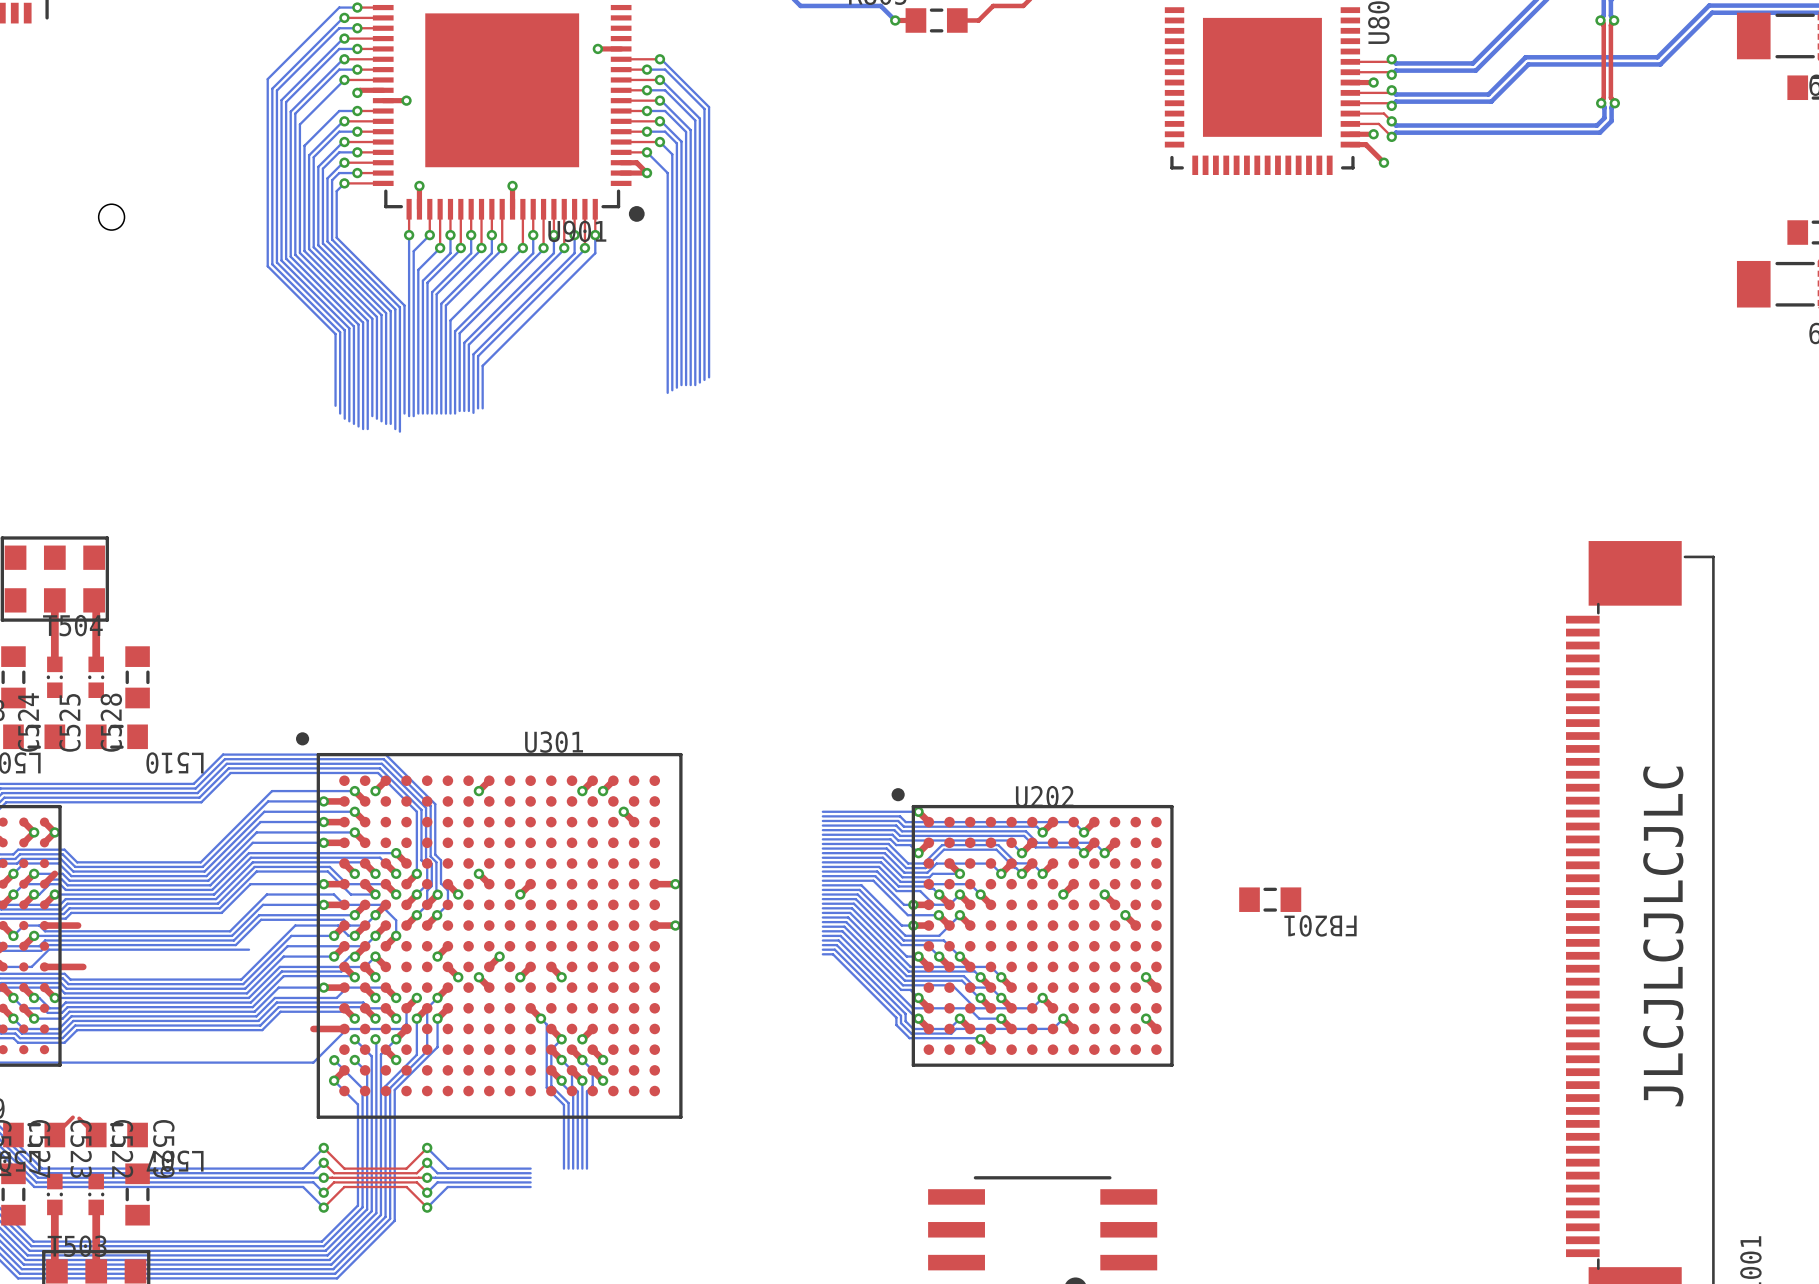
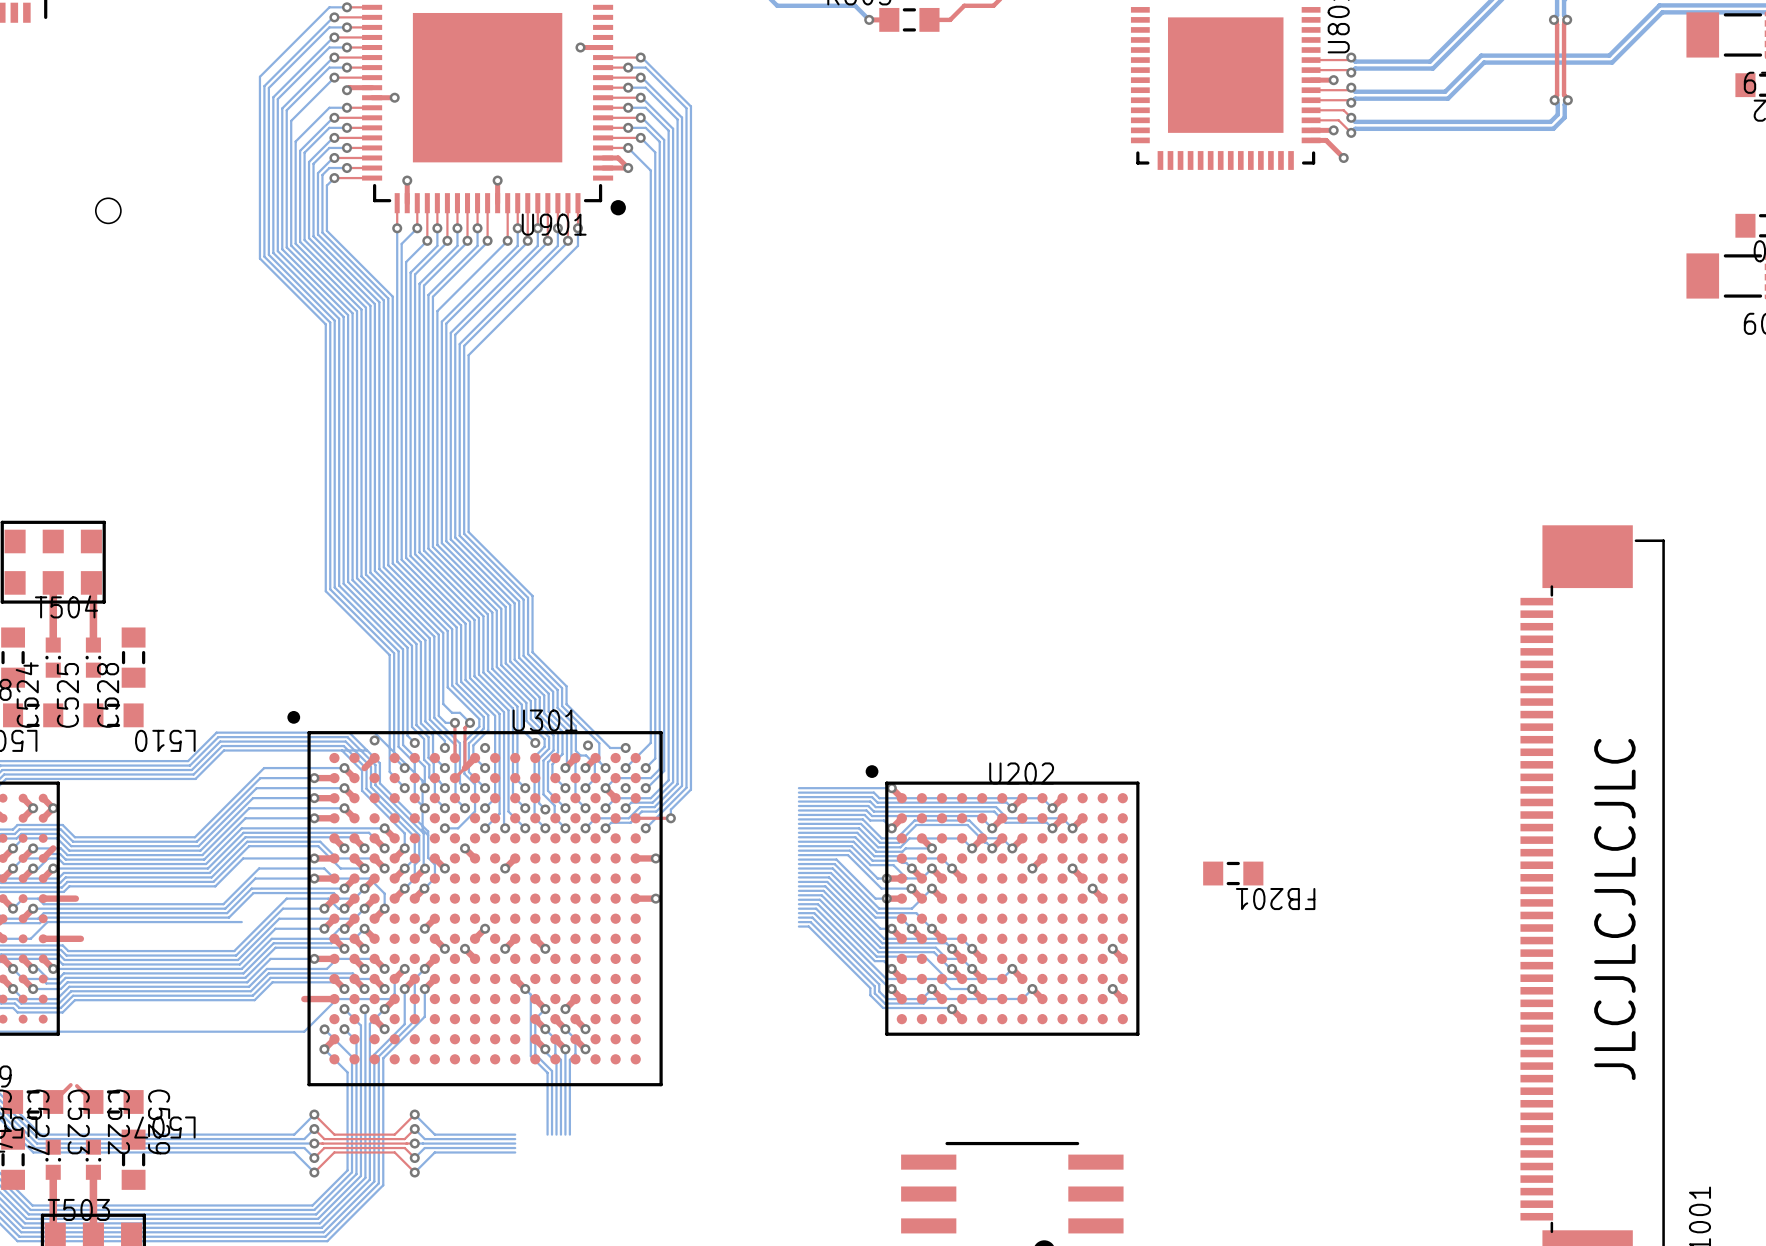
bottom track: (709, 107) (709, 377) -> (688, 103) (690, 106) (690, 789) (670, 809) (670, 818)
bottom track: (704, 108) (704, 379) -> (683, 105) (686, 108) (686, 787) (645, 828)
bottom track: (699, 118) (699, 382) -> (679, 115) (682, 117) (682, 785) (656, 811) (641, 811) (630, 822) (611, 822) (605, 828)
bottom track: (695, 120) (695, 385) -> (675, 116) (677, 119) (677, 784) (654, 807) (639, 807) (628, 818) (595, 818) (585, 828)
bottom track: (690, 130) (690, 385) -> (670, 126) (673, 128) (673, 782) (652, 802) (631, 802) (625, 808)
bottom track: (686, 131) (686, 385) -> (666, 128) (668, 130) (668, 780) (650, 798) (615, 798) (605, 808)
bottom track: (681, 141) (681, 385) -> (661, 137) (664, 139) (664, 771) (645, 788)
bottom track: (676, 143) (676, 387) -> (657, 139) (659, 141) (659, 769) (650, 778) (615, 778) (605, 788)
bottom track: (672, 154) (672, 390) -> (652, 149) (655, 152) (655, 758) (645, 768)
bottom track: (667, 173) (667, 392) -> (648, 168) (650, 170) (650, 742) (625, 768)
bottom track: none -> (325, 393) (325, 591) (389, 655) (389, 771) (404, 788)
bottom track: none -> (464, 396) (464, 533) (528, 597) (528, 654) (562, 688) (562, 706) (599, 743) (599, 761) (605, 768)
bottom track: none -> (468, 396) (468, 532) (532, 595) (532, 652) (566, 686) (566, 704) (610, 747) (625, 747)
bottom track: none -> (446, 399) (446, 541) (510, 605) (510, 661) (544, 695) (544, 713) (562, 731) (562, 754) (552, 764) (552, 775) (565, 788)
bottom track: none -> (450, 399) (450, 539) (514, 603) (514, 659) (548, 693) (548, 711) (566, 729) (565, 768)
bottom track: none -> (455, 399) (455, 537) (519, 601) (519, 657) (553, 691) (553, 709) (571, 728) (571, 758) (575, 763) (575, 798) (585, 808)
bottom track: none -> (459, 400) (459, 535) (523, 599) (523, 655) (557, 689) (557, 707) (575, 726) (575, 750) (580, 755) (586, 755) (594, 764) (594, 778) (585, 788)
bottom track: none -> (330, 401) (330, 589) (394, 653) (394, 757) (404, 768)
bottom track: none -> (392, 401) (392, 563) (456, 627) (456, 683) (488, 715) (488, 730) (473, 745) (473, 756) (485, 768)
bottom track: none -> (406, 401) (406, 557) (470, 621) (470, 678) (504, 712) (505, 828)
bottom track: none -> (410, 401) (410, 556) (474, 619) (474, 676) (508, 710) (508, 811) (525, 828)
bottom track: none -> (415, 401) (415, 554) (478, 618) (478, 674) (512, 708) (512, 795) (525, 808)
bottom track: none -> (419, 401) (419, 552) (483, 616) (483, 672) (517, 706) (517, 780) (525, 788)
bottom track: none -> (423, 401) (423, 550) (487, 614) (487, 670) (521, 704) (521, 729) (535, 742)
bottom track: none -> (428, 401) (428, 548) (492, 612) (492, 668) (526, 702) (526, 720) (544, 739) (544, 746) (534, 756) (534, 817) (545, 828)
bottom track: none -> (432, 401) (432, 546) (496, 610) (496, 667) (530, 701) (530, 719) (549, 737) (549, 748) (539, 758) (539, 803) (545, 809)
bottom track: none -> (437, 401) (437, 544) (501, 608) (501, 665) (535, 699) (535, 717) (553, 735) (553, 750) (543, 760) (543, 794) (554, 805) (554, 817) (565, 828)
bottom track: none -> (441, 401) (441, 543) (505, 607) (505, 663) (539, 697) (539, 715) (558, 733) (558, 752) (547, 762) (547, 790) (565, 808)
bottom track: none -> (361, 404) (361, 576) (425, 640) (425, 721) (444, 740) (444, 747)
bottom track: none -> (397, 404) (397, 561) (461, 625) (461, 681) (495, 715) (495, 798) (485, 808)
bottom track: none -> (401, 404) (401, 559) (465, 623) (465, 679) (499, 714) (499, 813) (485, 828)
bottom track: none -> (334, 406) (334, 587) (398, 651) (398, 746) (414, 763) (414, 798) (424, 808)
bottom track: none -> (365, 406) (365, 574) (429, 638) (429, 719) (455, 745) (455, 798) (464, 808)
bottom track: none -> (339, 409) (339, 585) (403, 649) (403, 745) (424, 766) (424, 788)
bottom track: none -> (370, 409) (370, 572) (434, 636) (434, 717) (459, 743) (459, 783) (464, 788)
bottom track: none -> (343, 411) (343, 583) (407, 647) (407, 735) (414, 742)
bottom track: none -> (374, 411) (374, 570) (438, 634) (438, 715) (445, 722) (454, 722)
bottom track: none -> (379, 411) (379, 569) (443, 632) (443, 704) (452, 712) (459, 712) (470, 722)
bottom track: none -> (348, 414) (348, 581) (411, 645) (411, 726) (424, 739) (424, 759) (429, 764) (429, 777) (434, 783) (434, 798) (444, 808)
bottom track: none -> (352, 416) (352, 580) (416, 644) (416, 725) (428, 737) (428, 757) (433, 763) (433, 775) (444, 788)
bottom track: none -> (357, 416) (357, 578) (420, 642) (420, 723) (433, 735) (433, 756) (444, 768)
bottom track: none -> (383, 416) (383, 567) (447, 631) (447, 687) (479, 719) (479, 726) (464, 741) (464, 773) (475, 784) (475, 811) (458, 828) (444, 828)
bottom track: none -> (388, 419) (388, 565) (452, 629) (452, 685) (483, 717) (483, 728) (468, 743) (468, 771) (485, 788)
top track: none -> (454, 722) (454, 758)
via: none -> (454, 722)
top track: none -> (470, 722) (464, 727) (464, 768) (454, 778)
via: none -> (470, 722)
bottom track: (357, 759) (383, 759) (430, 806) (430, 856) (436, 862) -> (347, 737) (375, 765) (375, 785) (423, 833) (423, 837)
via: none -> (374, 740)
bottom track: (356, 763) (381, 763) (426, 807) (426, 858) (431, 864) -> (345, 741) (370, 766) (370, 786) (419, 835) (419, 839)
via: none -> (414, 742)
via: none -> (535, 742)
via: none -> (588, 745)
bottom track: (354, 768) (379, 768) (421, 809) (421, 860) (427, 866) -> (343, 746) (366, 768) (366, 788) (414, 837) (414, 840)
via: none -> (444, 747)
via: none -> (485, 747)
via: none -> (625, 747)
bottom track: none -> (341, 750) (362, 770) (362, 790) (404, 833)
bottom track: (391, 786) (416, 811) (416, 858) -> (379, 763) (379, 783) (428, 831) (428, 835)
via: (375, 791) -> none
via: none -> (404, 768)
via: none -> (444, 768)
via: (478, 791) -> none
via: none -> (485, 768)
via: none -> (605, 768)
via: none -> (625, 768)
via: none -> (645, 768)
via: none -> (404, 788)
via: none -> (424, 788)
via: none -> (444, 788)
via: none -> (464, 788)
via: none -> (485, 788)
via: none -> (525, 788)
via: none -> (565, 788)
via: none -> (585, 788)
via: none -> (625, 788)
via: none -> (645, 788)
via: none -> (424, 808)
via: none -> (444, 808)
via: none -> (464, 808)
via: none -> (485, 808)
via: none -> (525, 808)
via: none -> (565, 808)
via: none -> (585, 808)
via: none -> (605, 808)
via: none -> (625, 808)
via: none -> (545, 809)
top track: none -> (635, 818) (670, 818)
via: none -> (670, 818)
via: none -> (444, 828)
via: none -> (485, 828)
via: none -> (505, 828)
via: none -> (525, 828)
via: none -> (545, 828)
via: none -> (565, 828)
via: none -> (585, 828)
via: none -> (605, 828)
via: none -> (645, 828)

